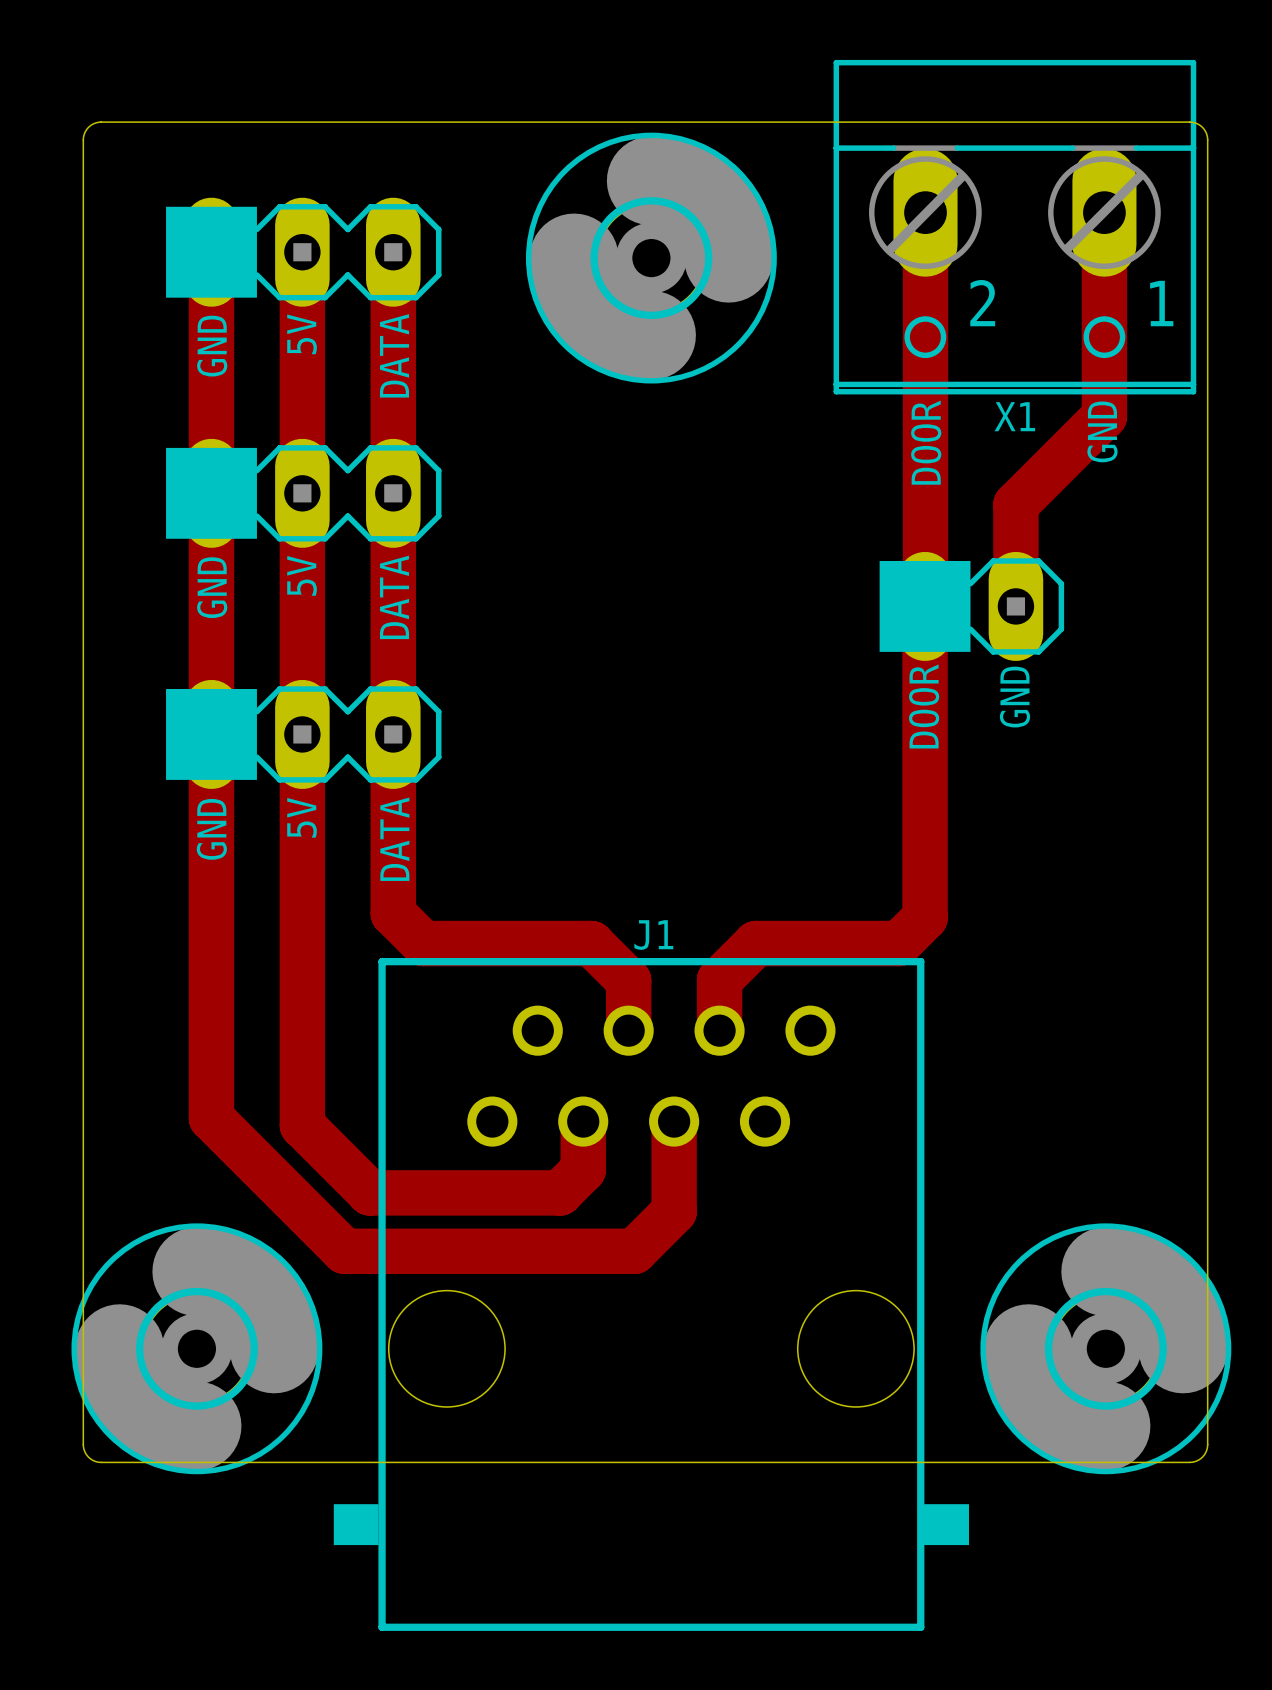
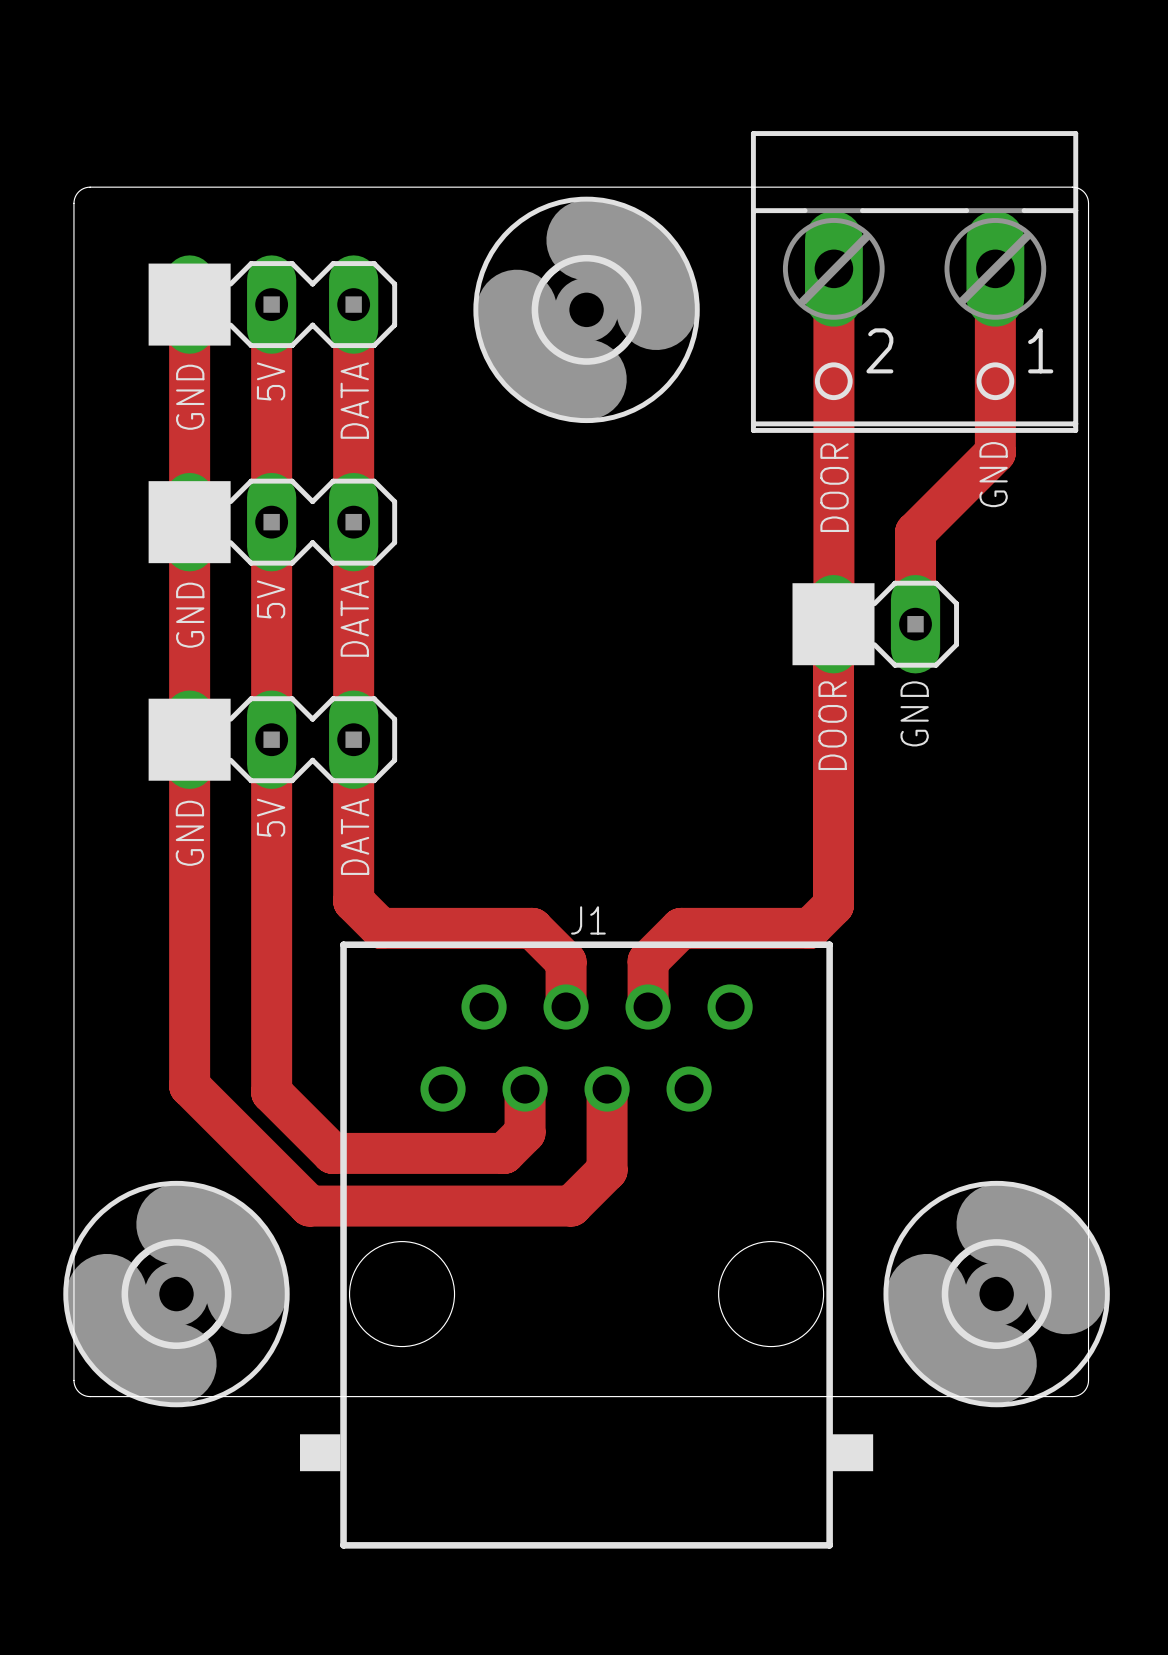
X1 name: X1 (1014, 416) -> none

